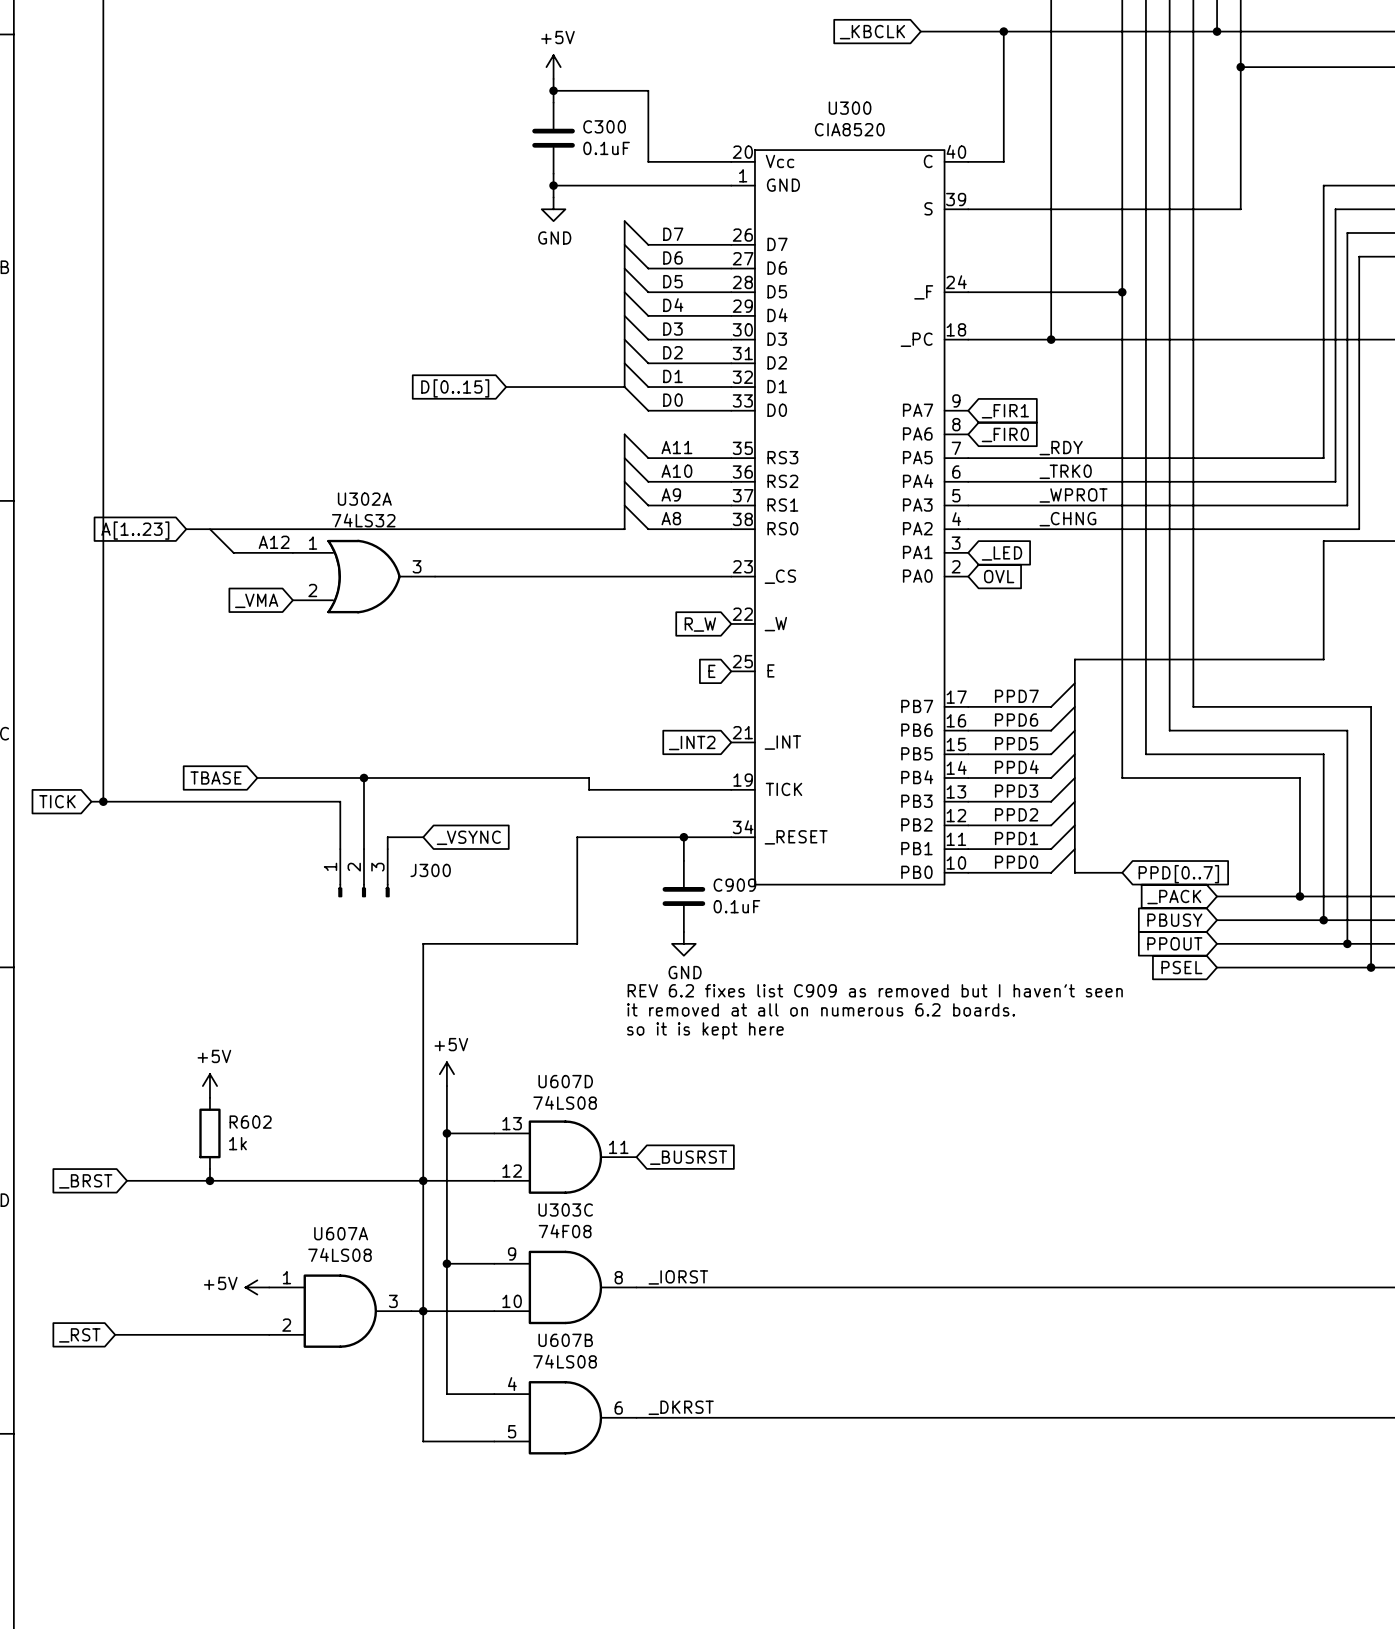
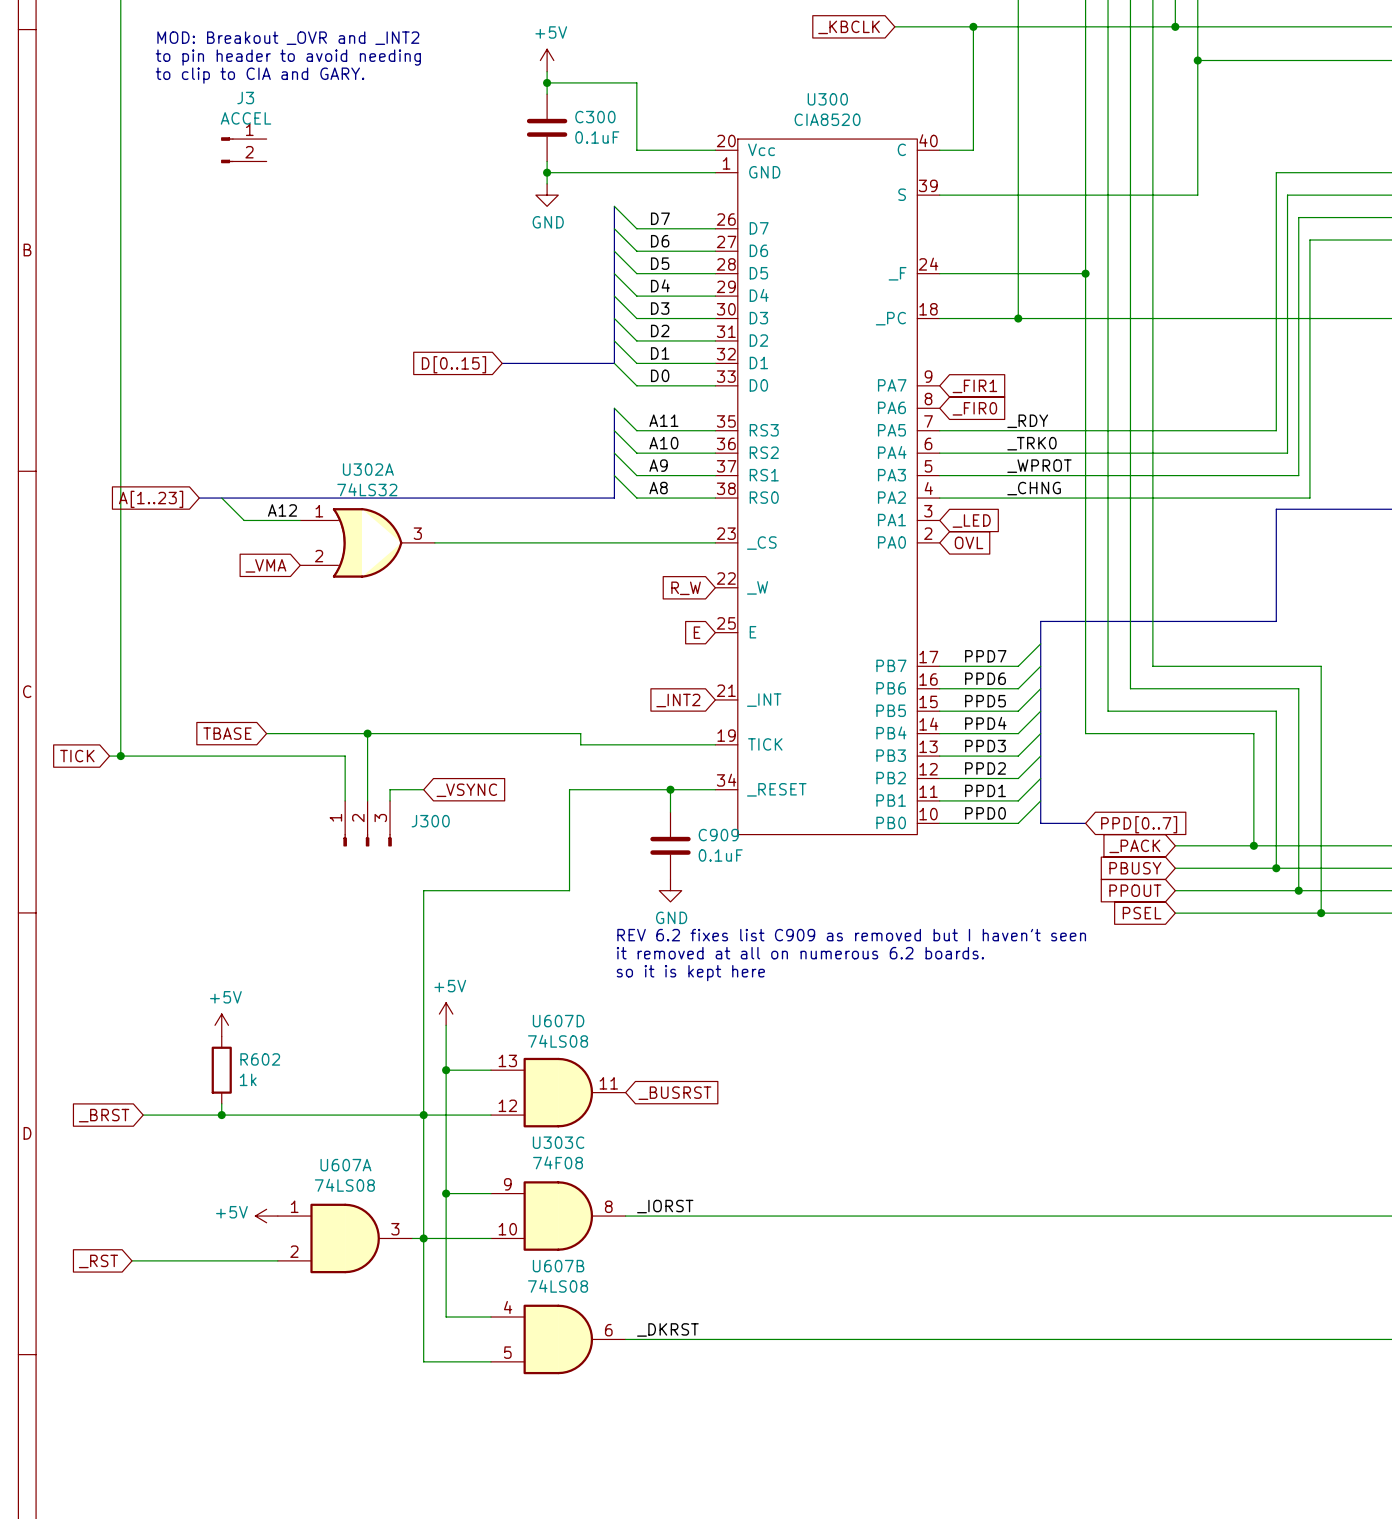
text: none -> MOD: Breakout _OVR and _INT2 (288, 38)
text: none -> to pin header to avoid needing (288, 57)
text: none -> to clip to CIA and GARY. (260, 75)
J3: none -> ACCEL (243, 150)

